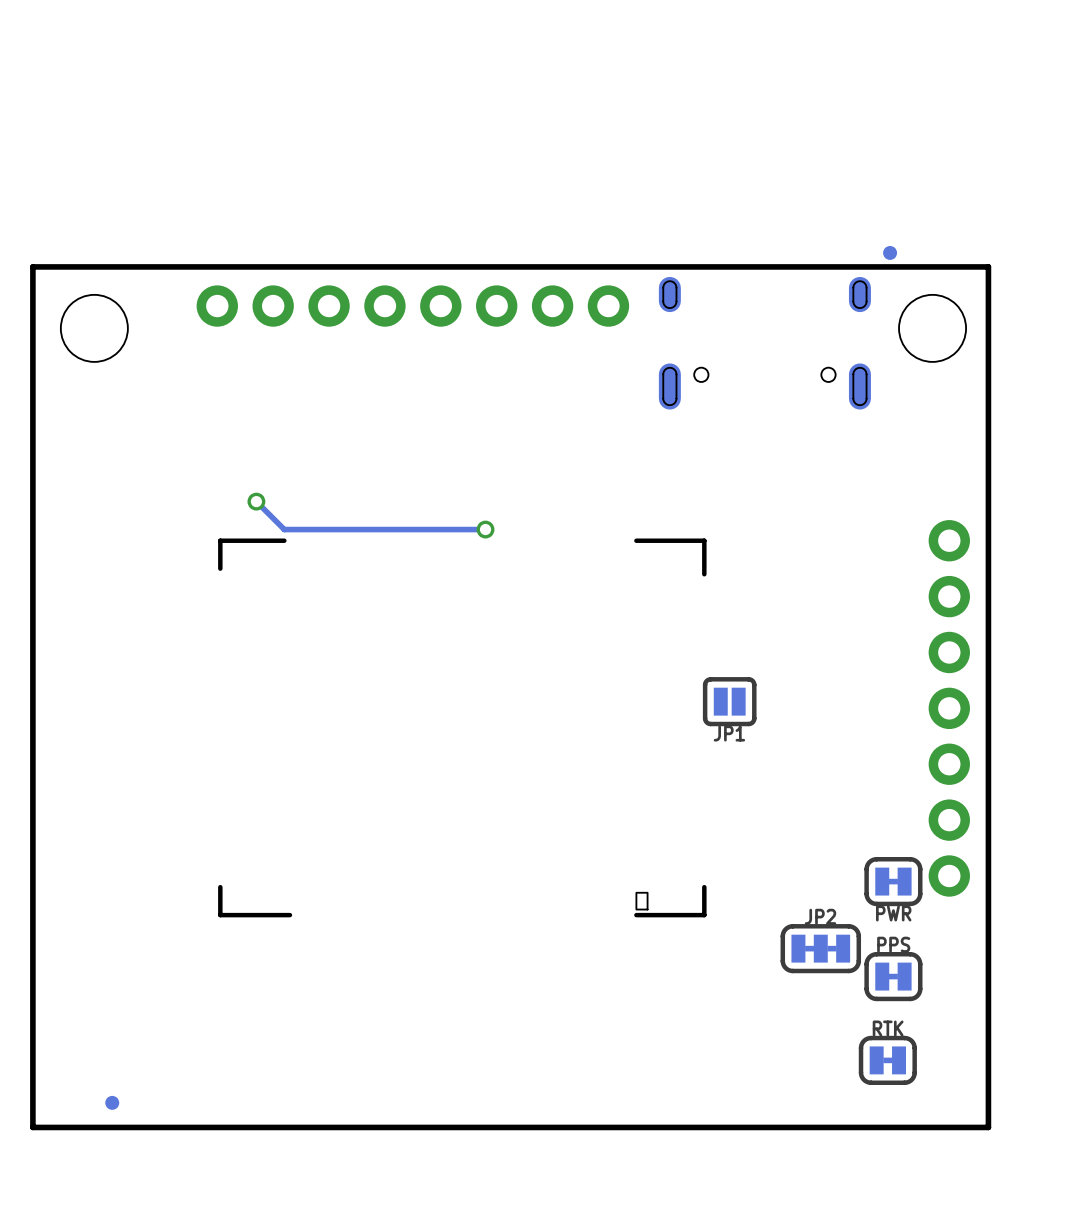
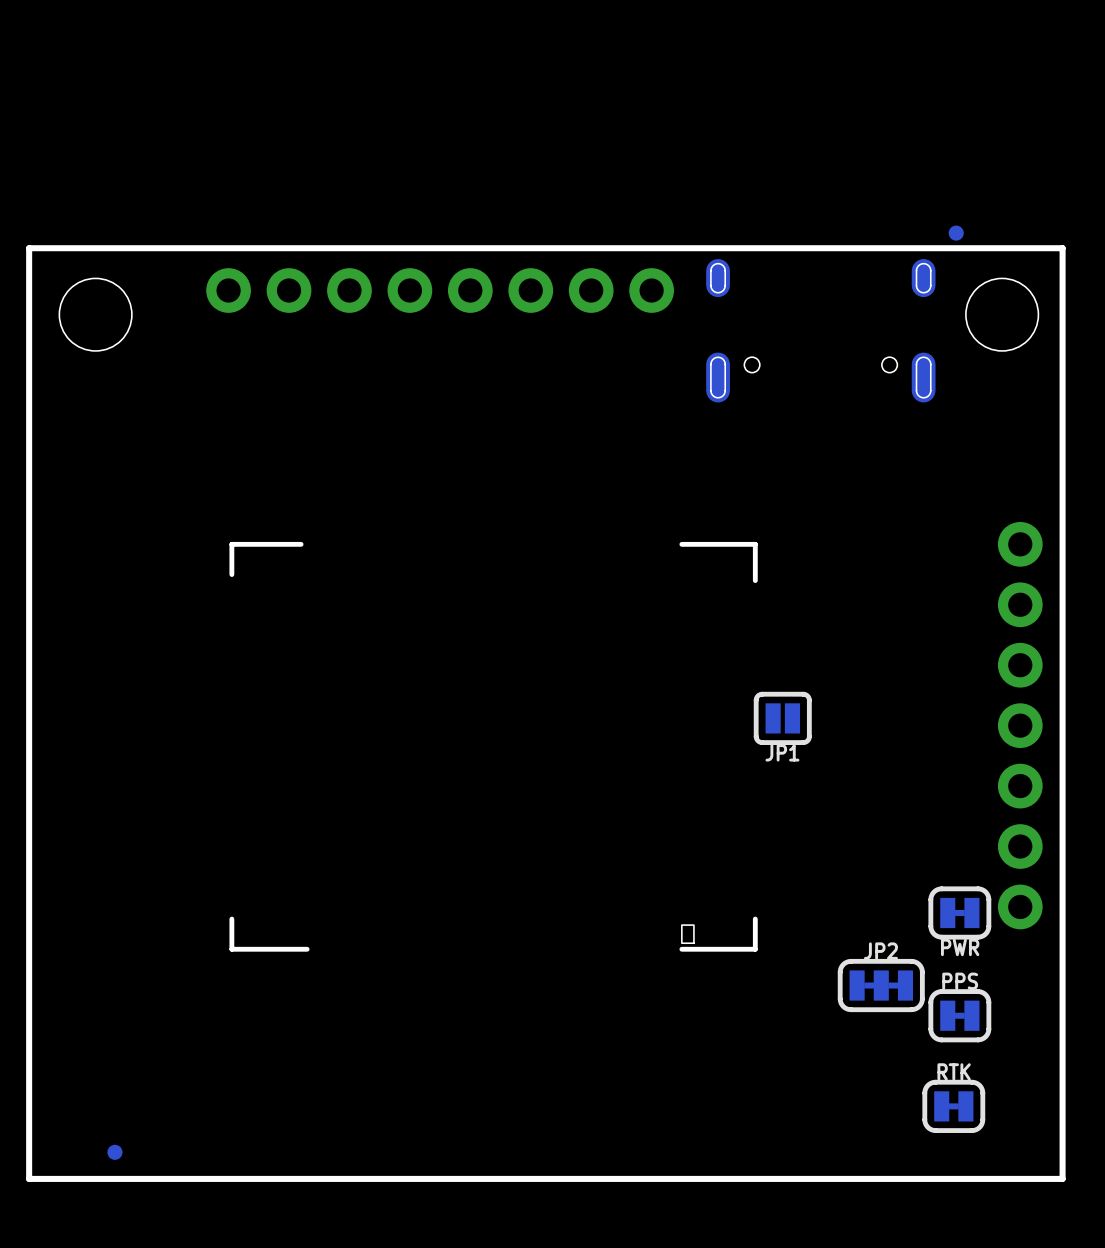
track: (256, 501) (284, 529) (485, 529) -> none
via: (256, 501) -> none
via: (485, 529) -> none

